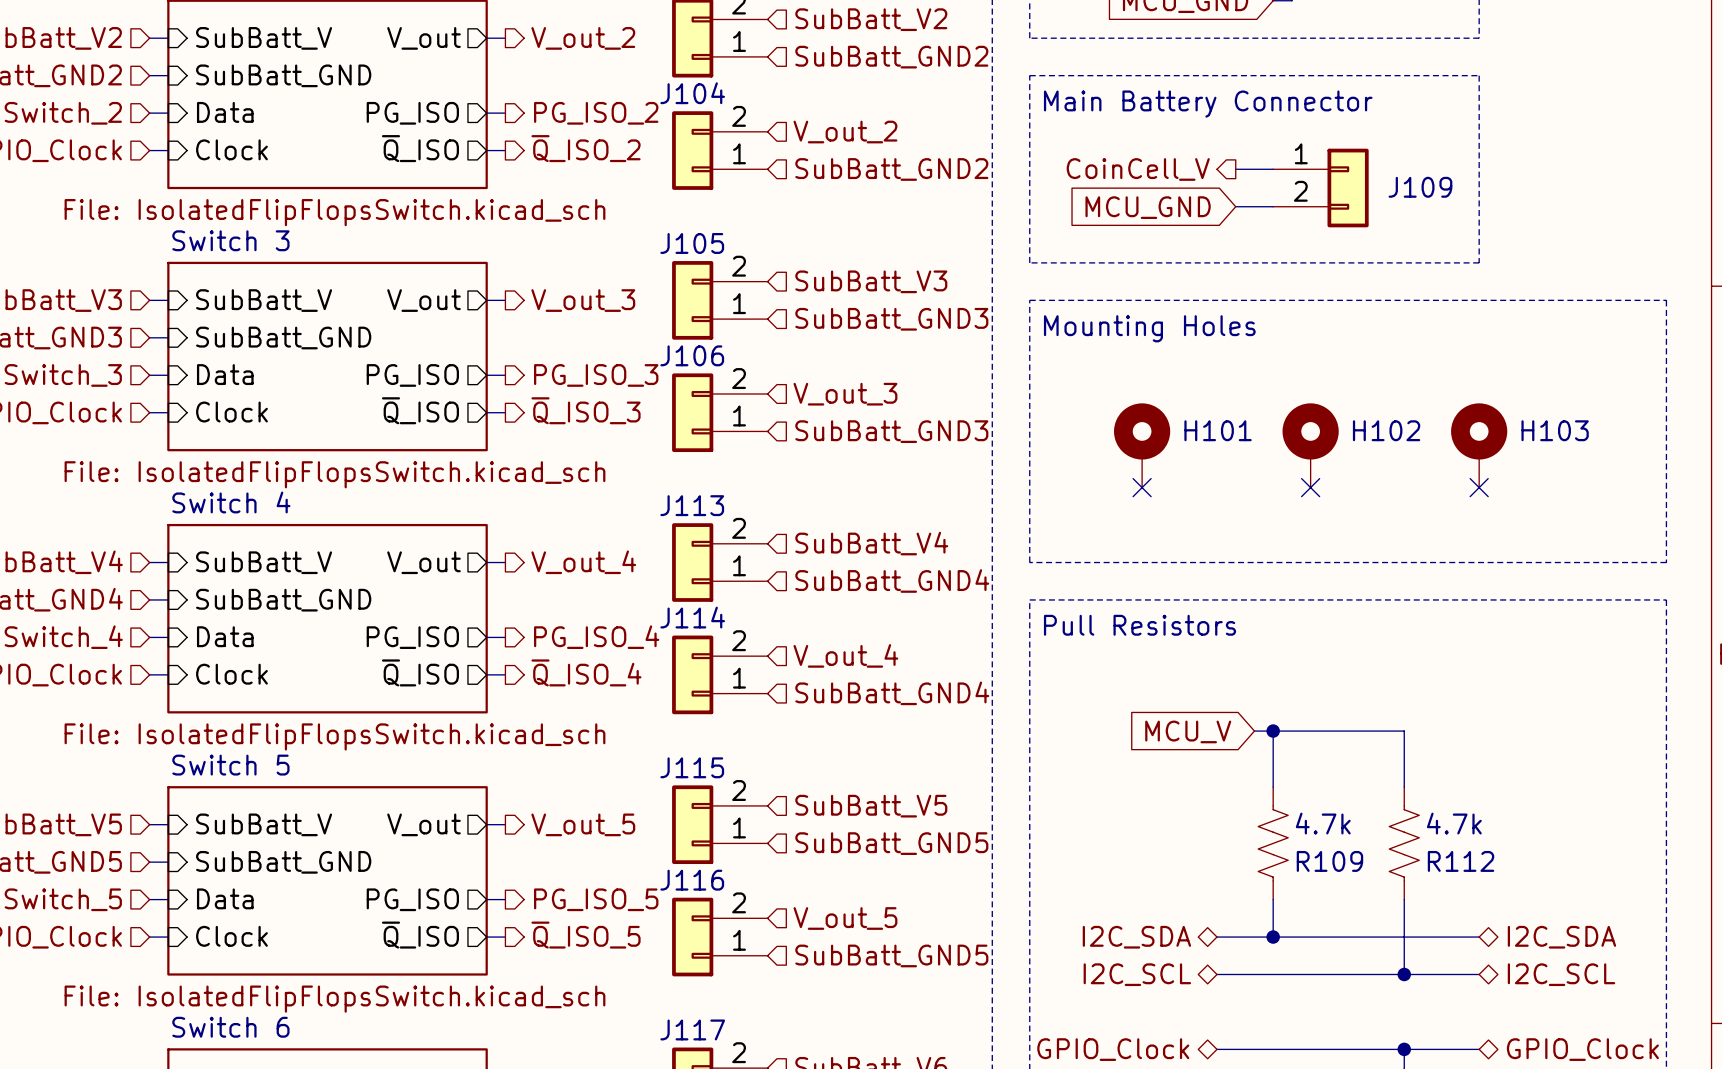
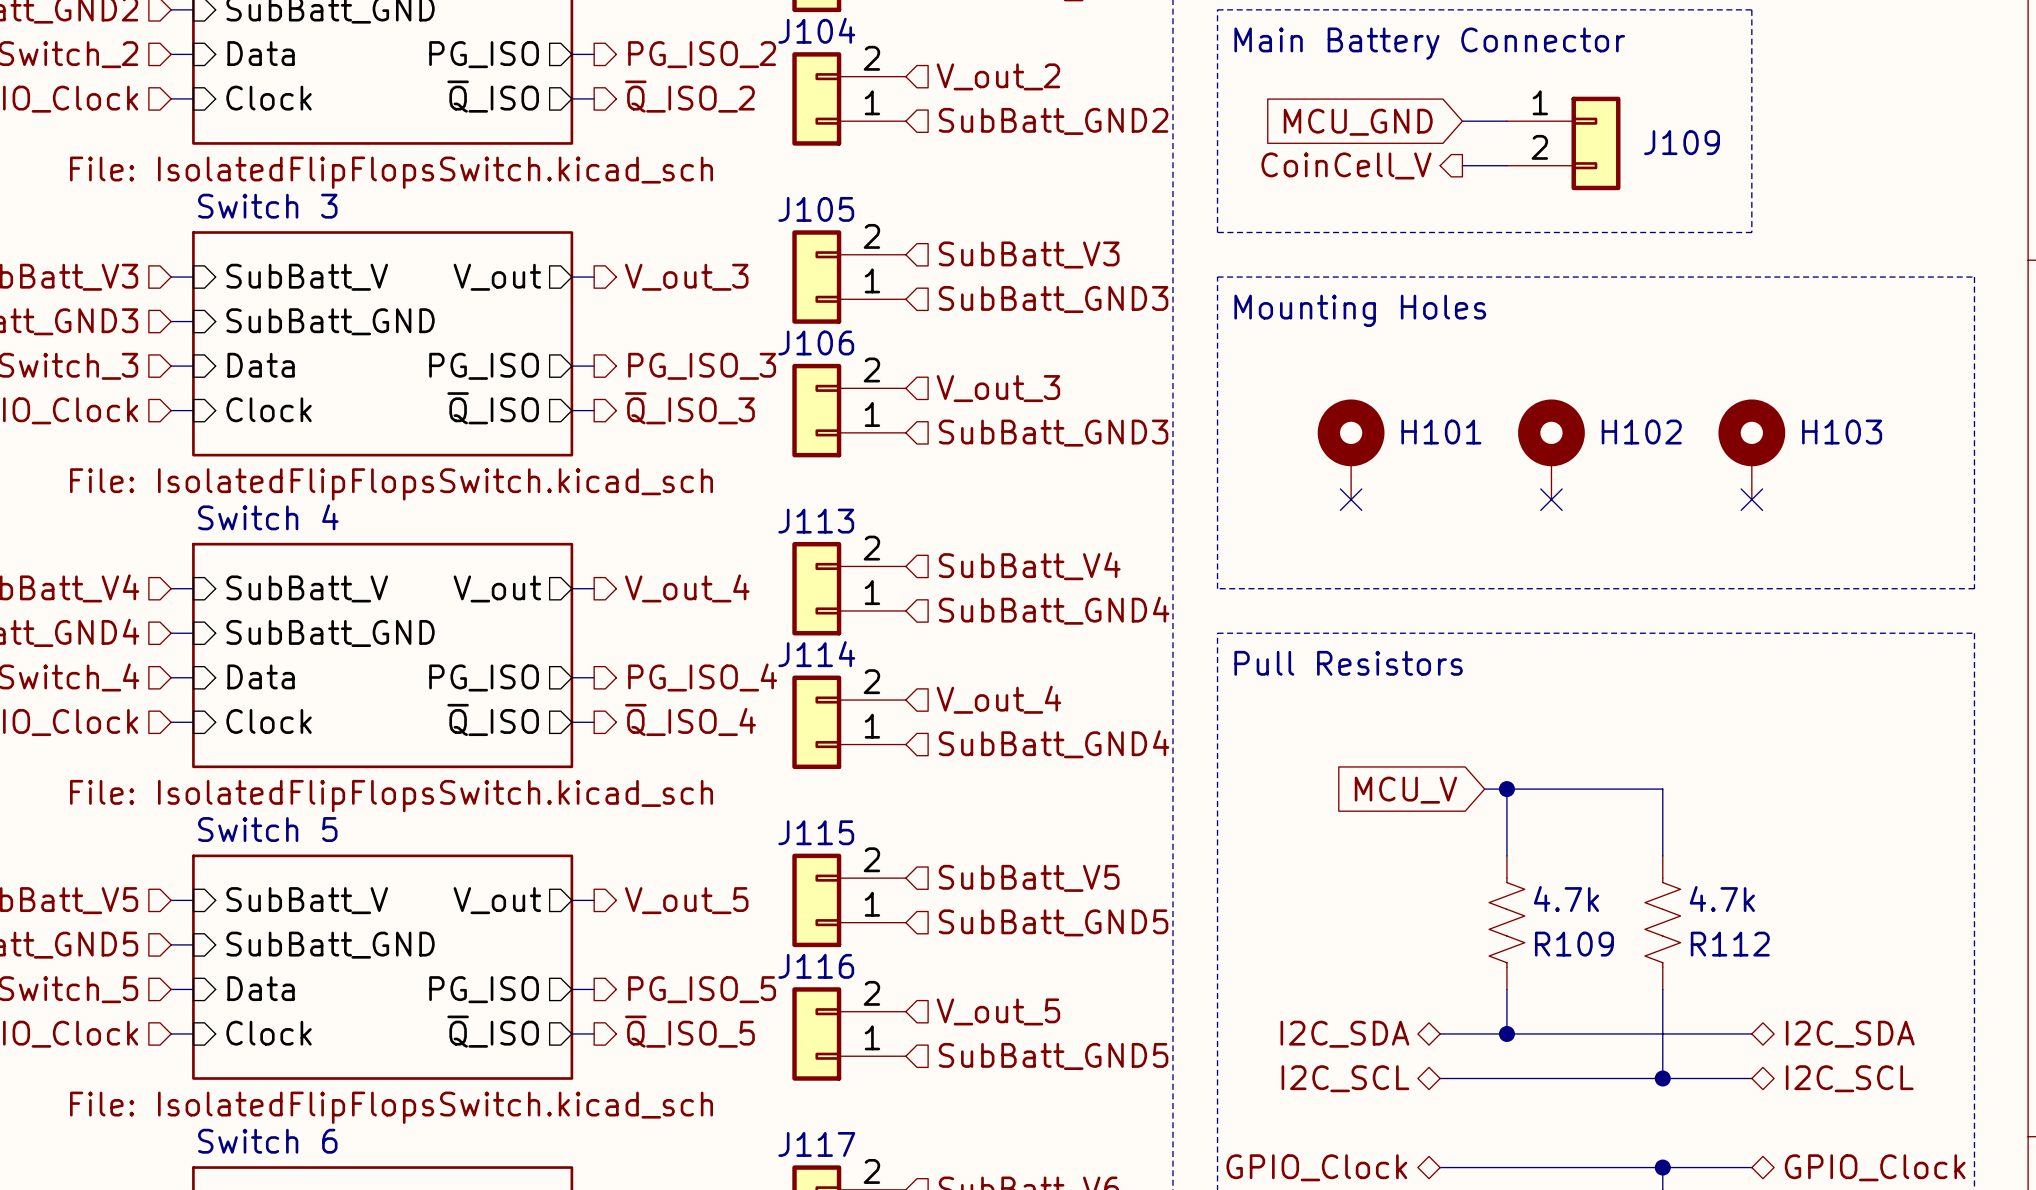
hierarchical label position: CoinCell_V (1138, 169) -> CoinCell_V (1346, 165)
global label position: MCU_GND (1148, 207) -> MCU_GND (1358, 122)

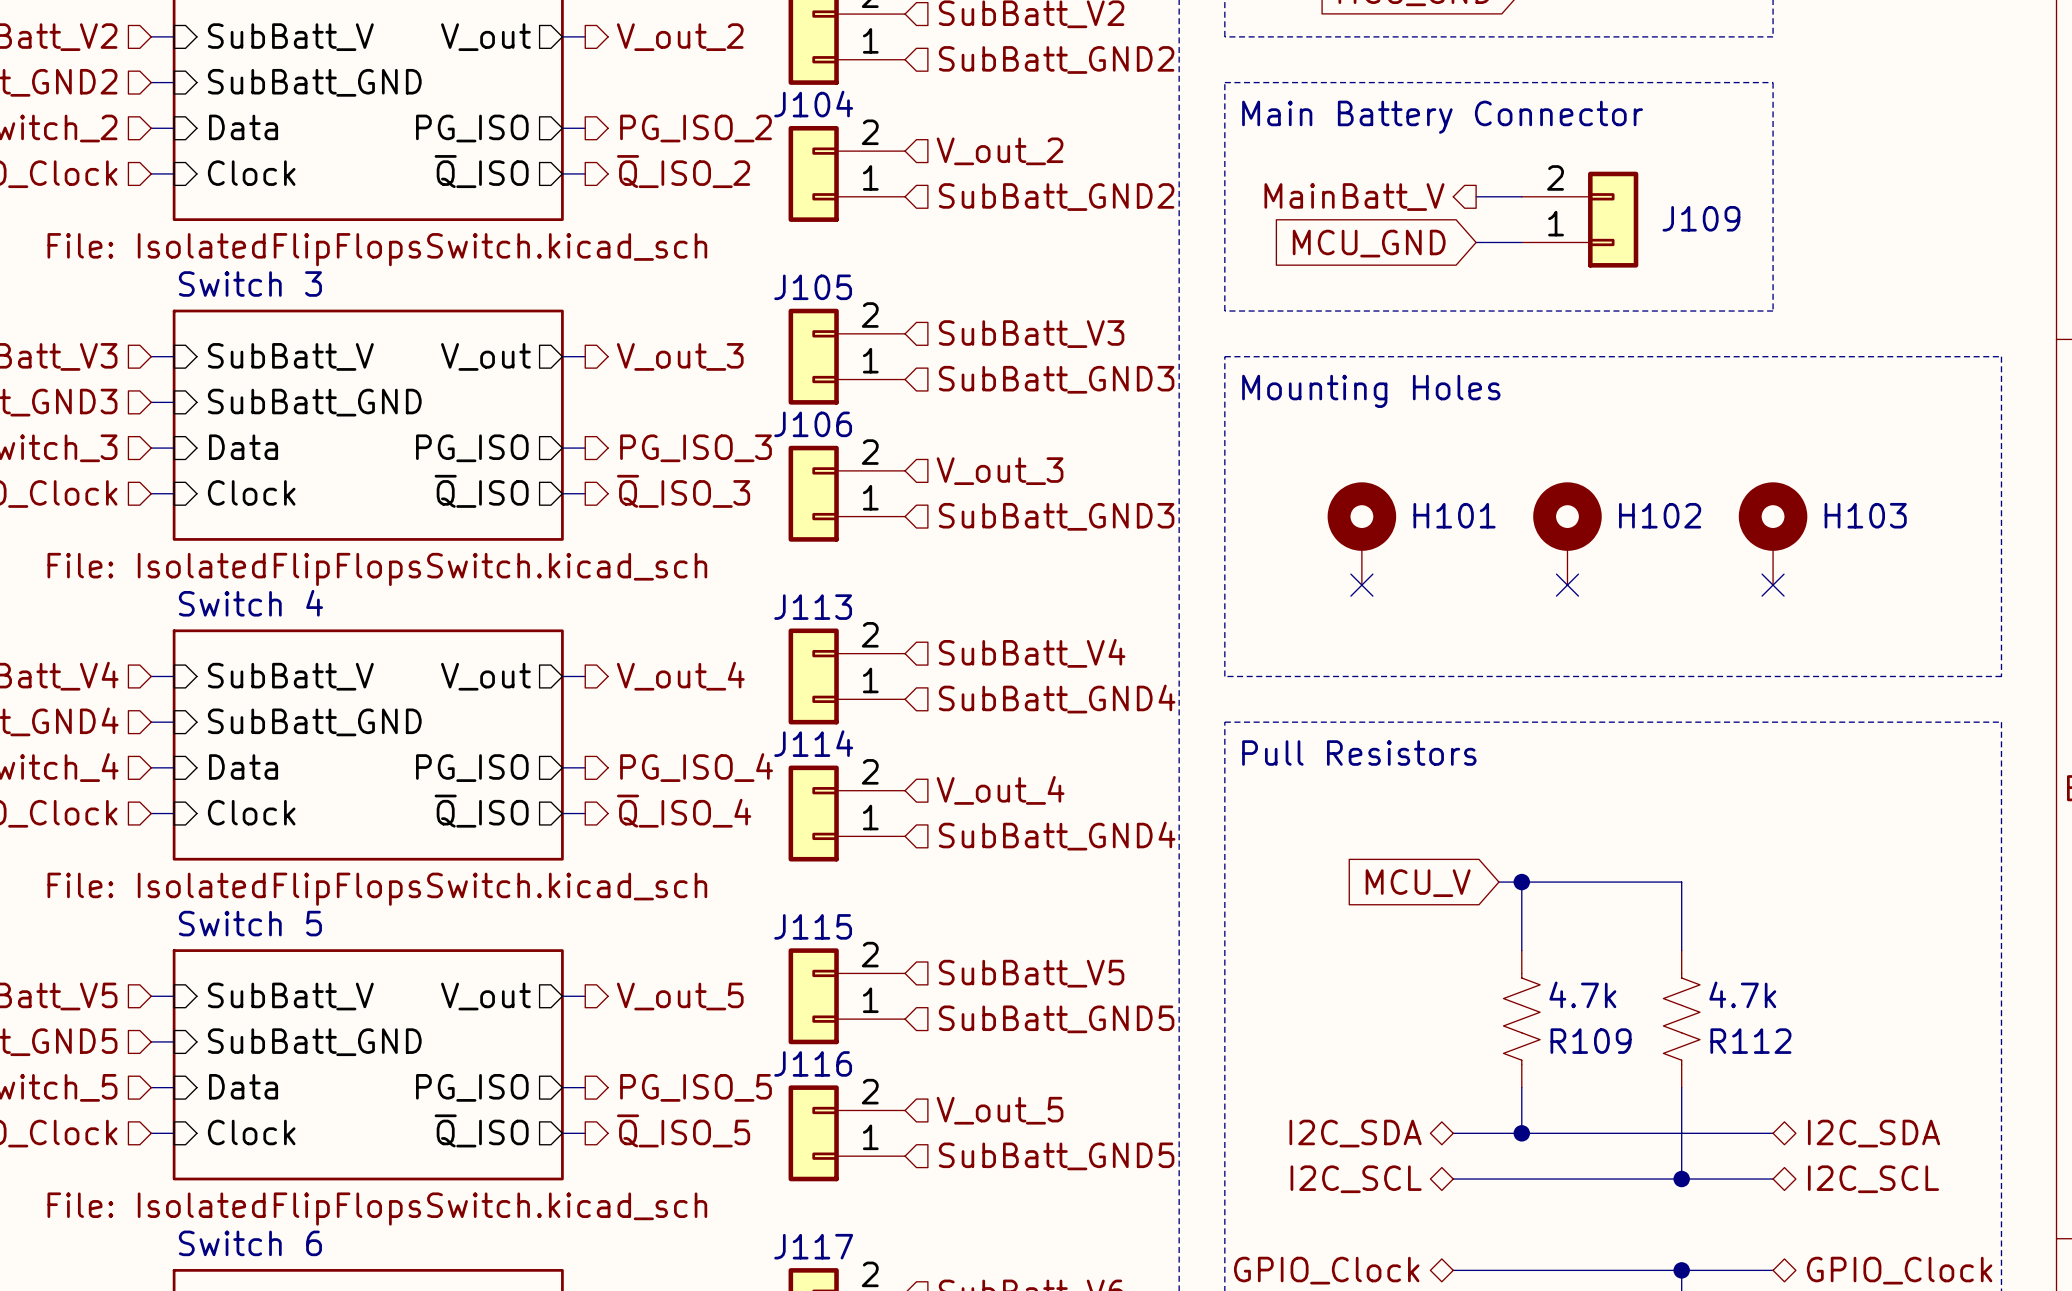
hierarchical label: none -> MainBatt_V (1354, 197)
global label position: MCU_GND (1358, 122) -> MCU_GND (1369, 243)
J109 flip: as is (1595, 143) -> up-down (1613, 219)
hierarchical label: CoinCell_V (1346, 165) -> none

